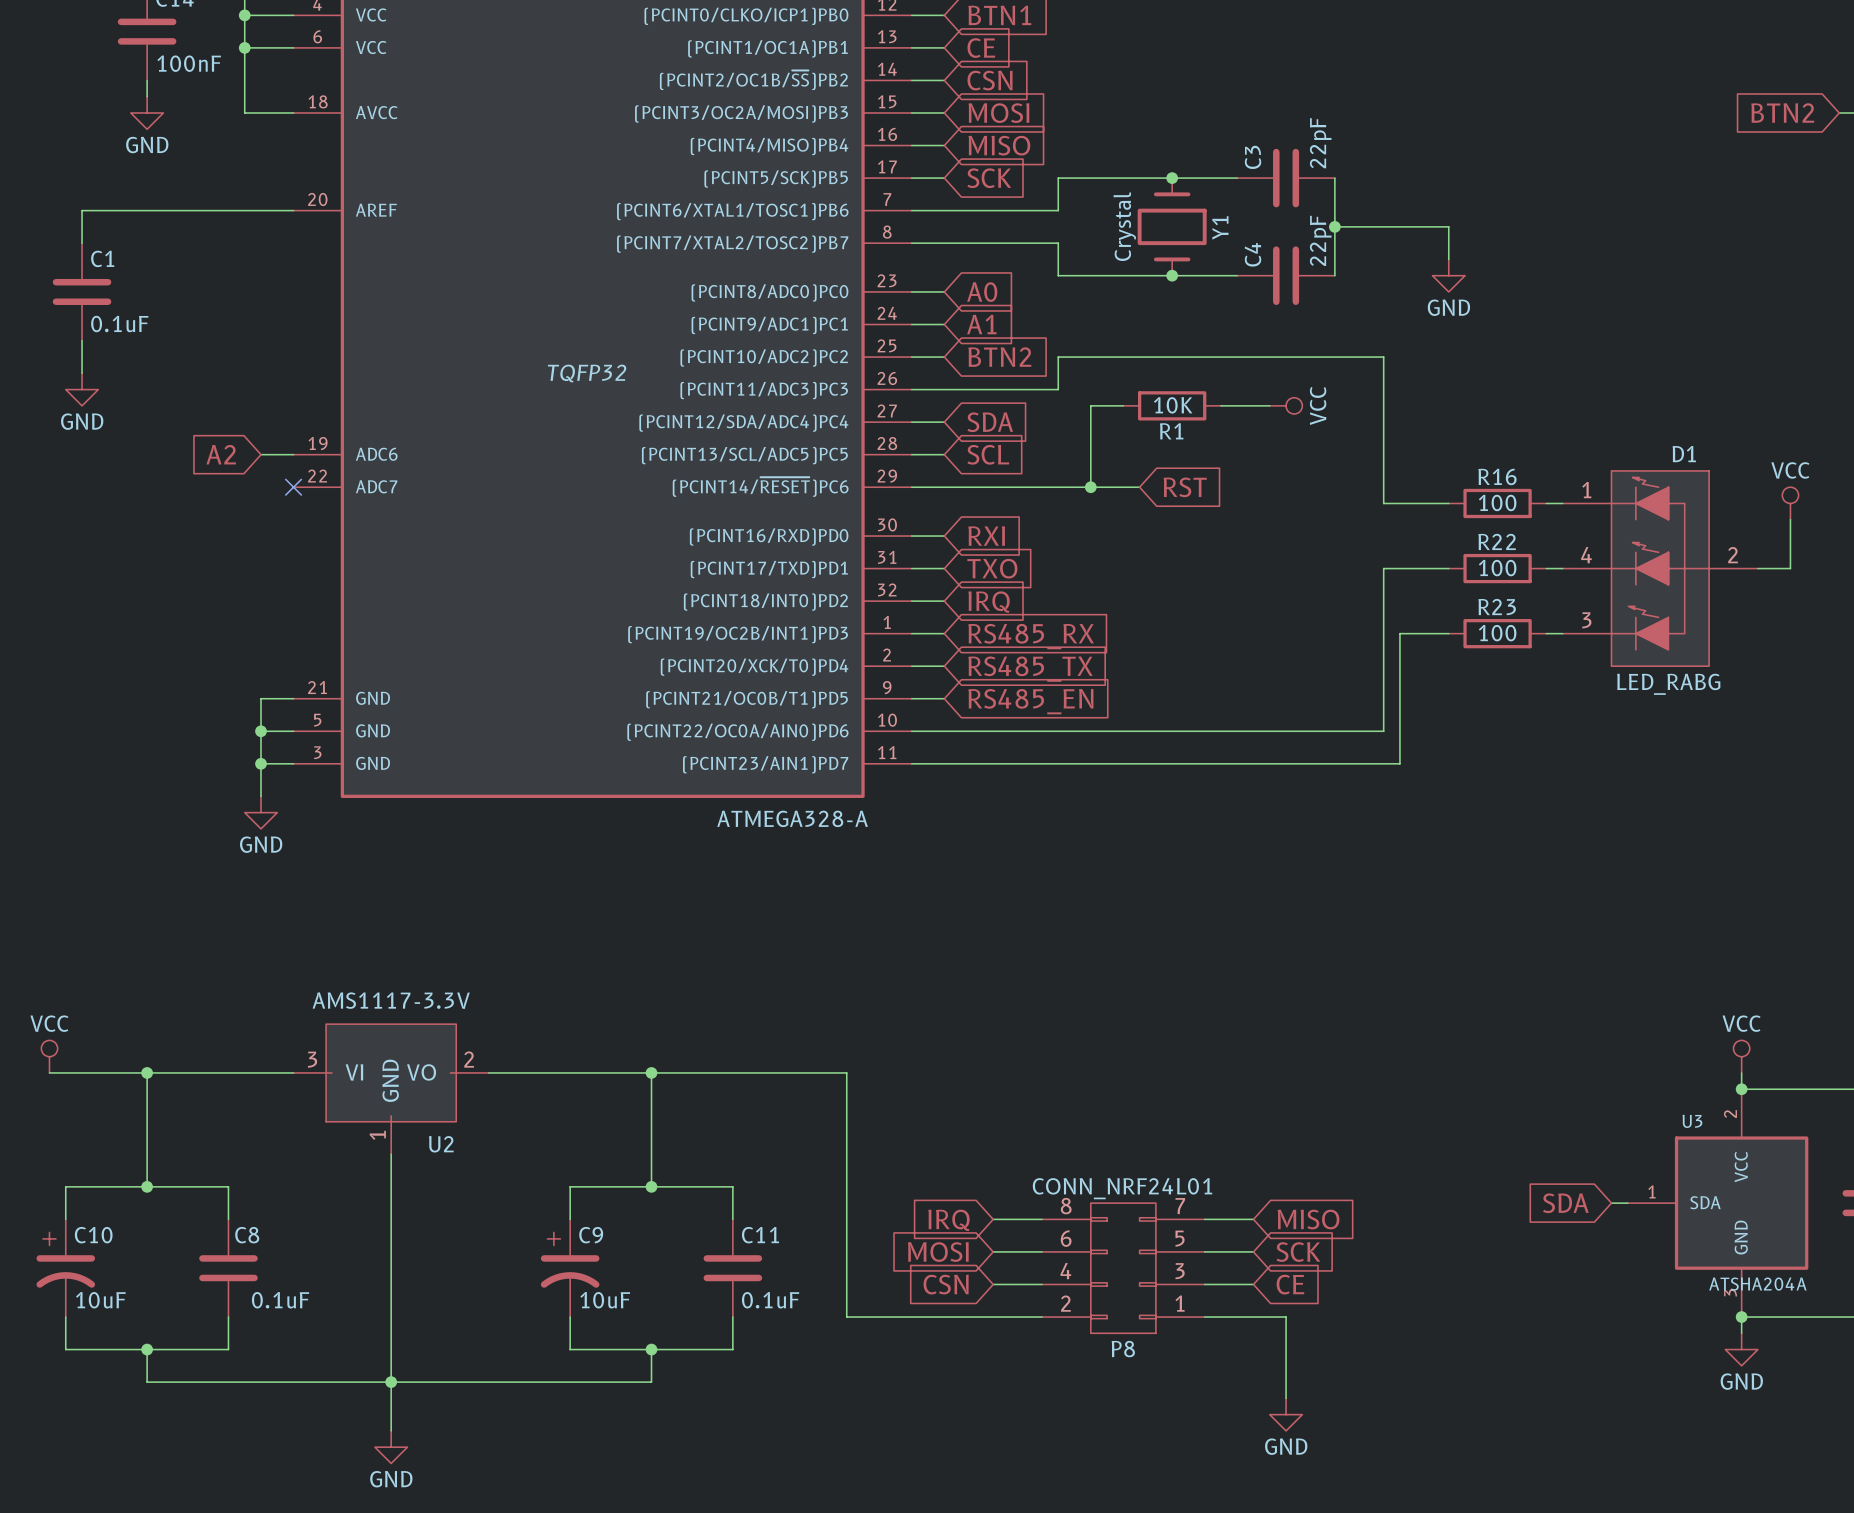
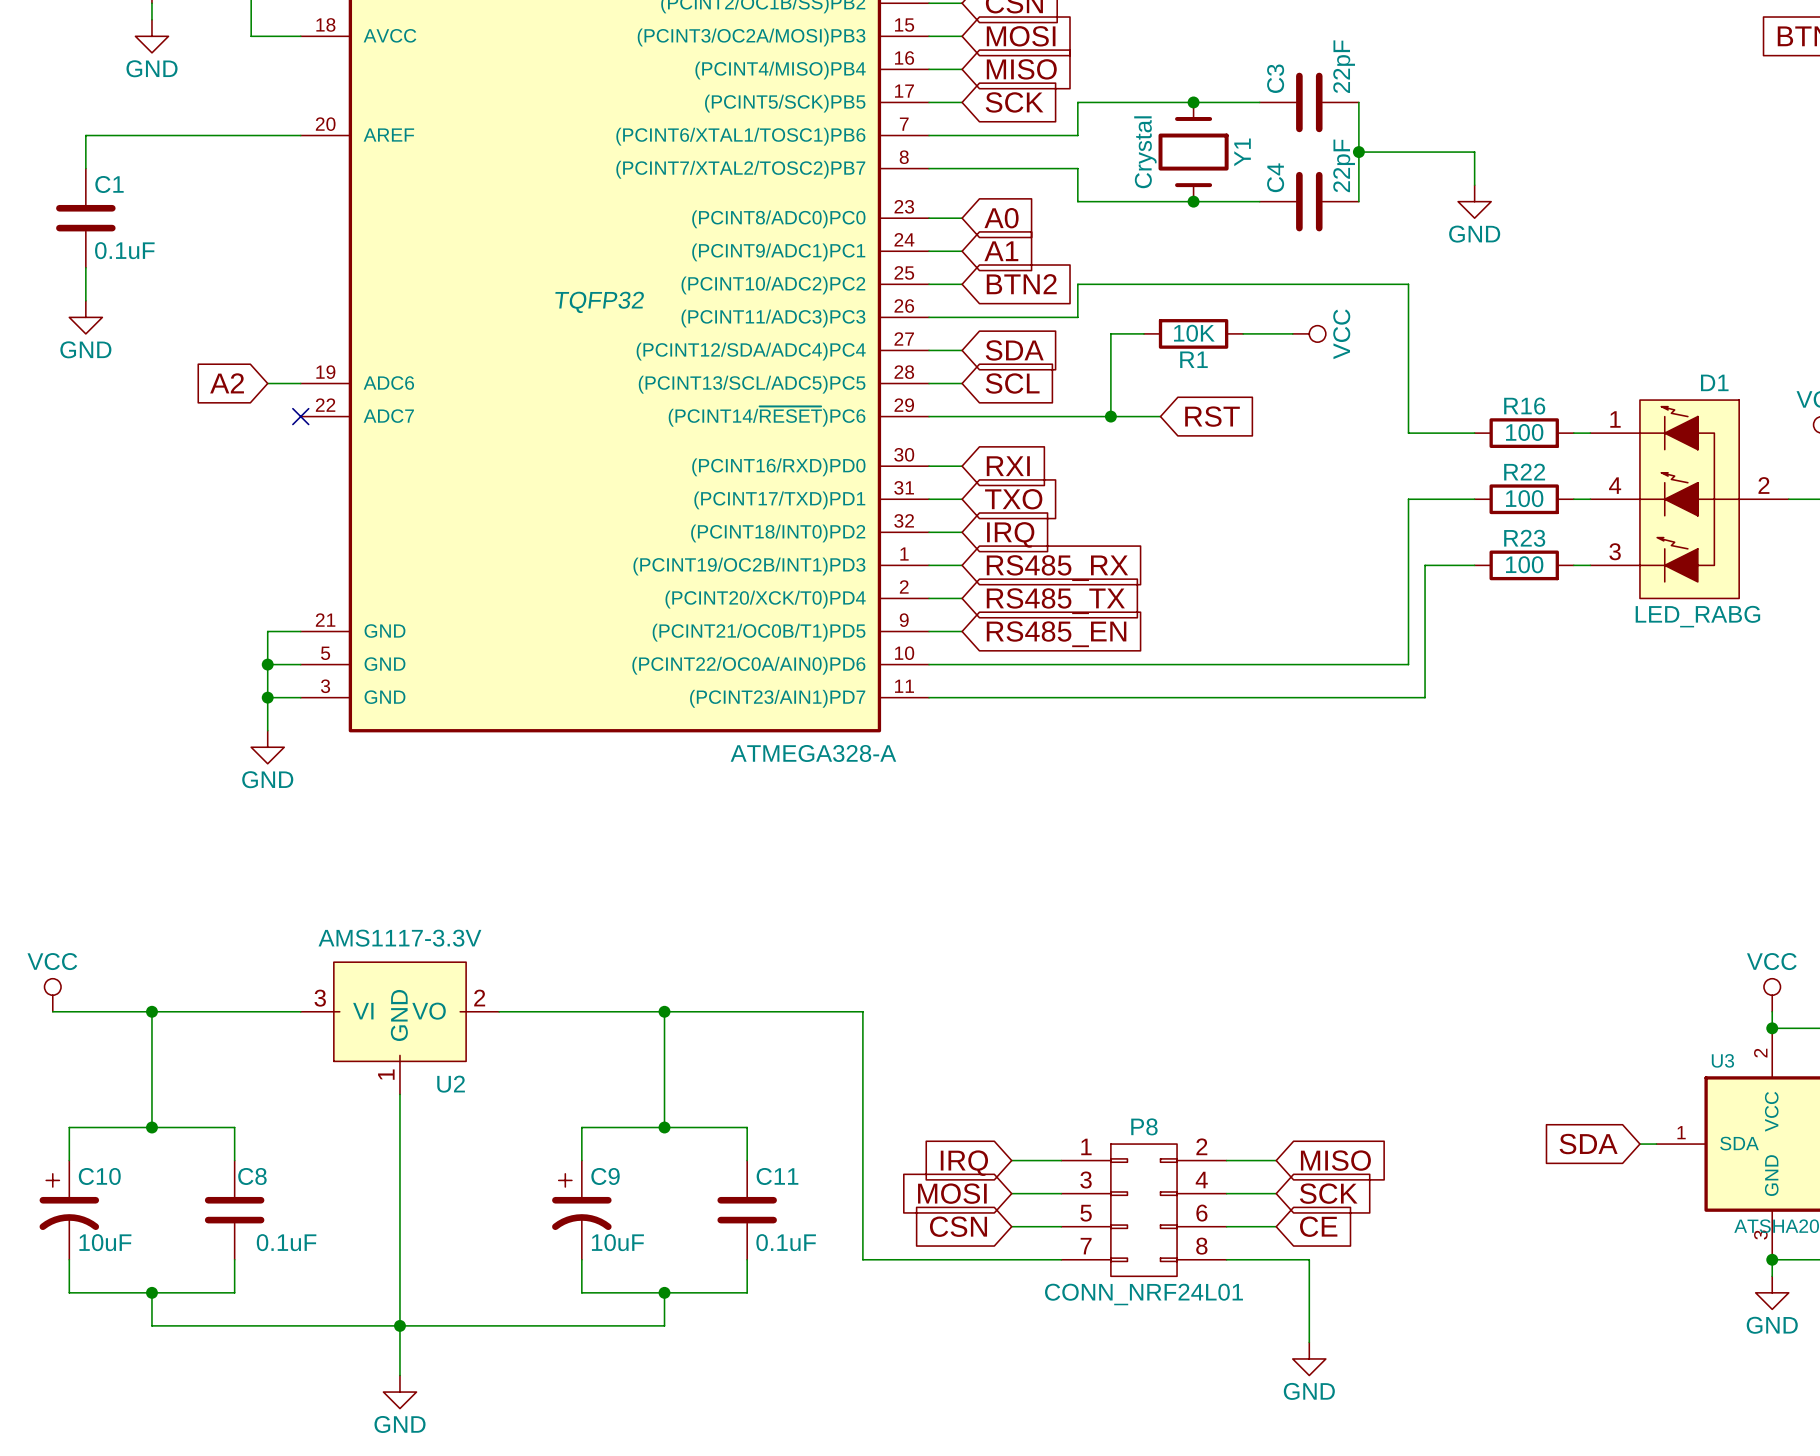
P8 rotation: 0° (1123, 1268) -> 180° (1143, 1210)

